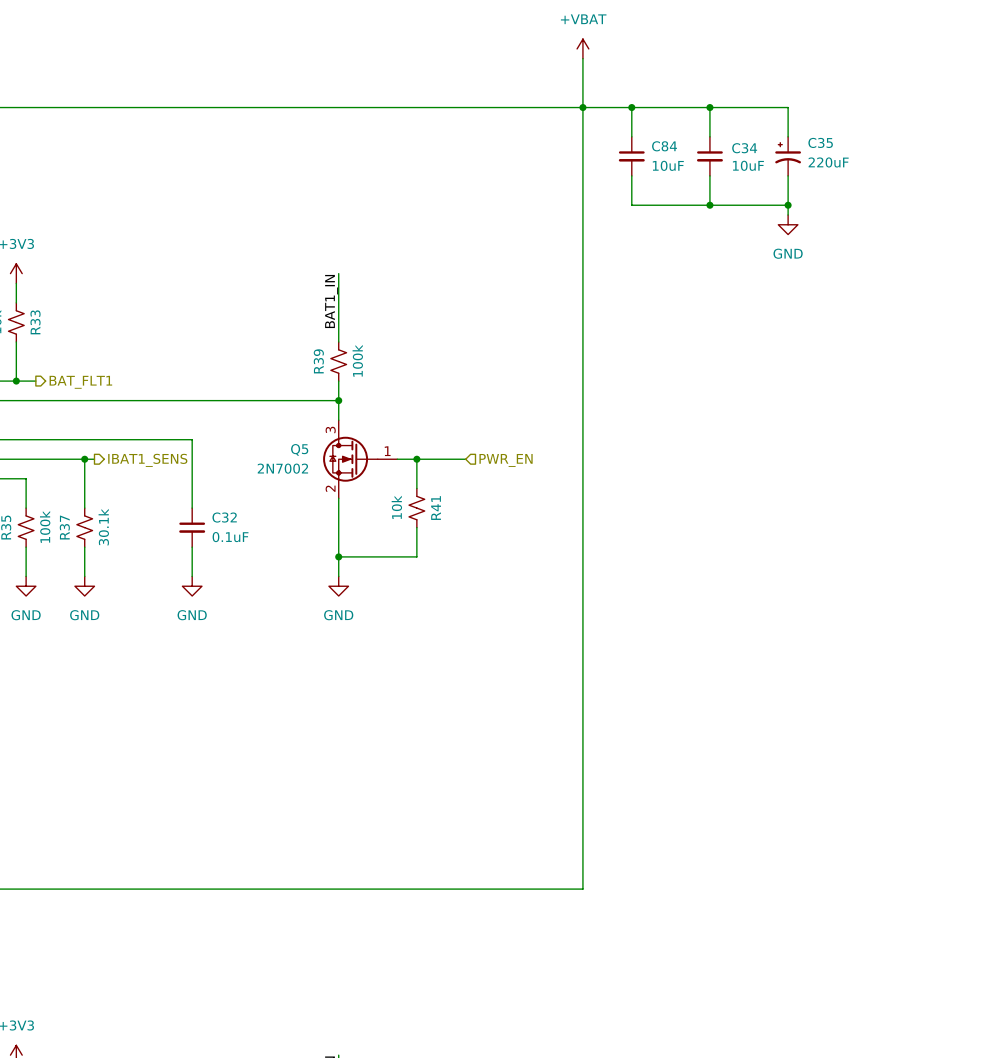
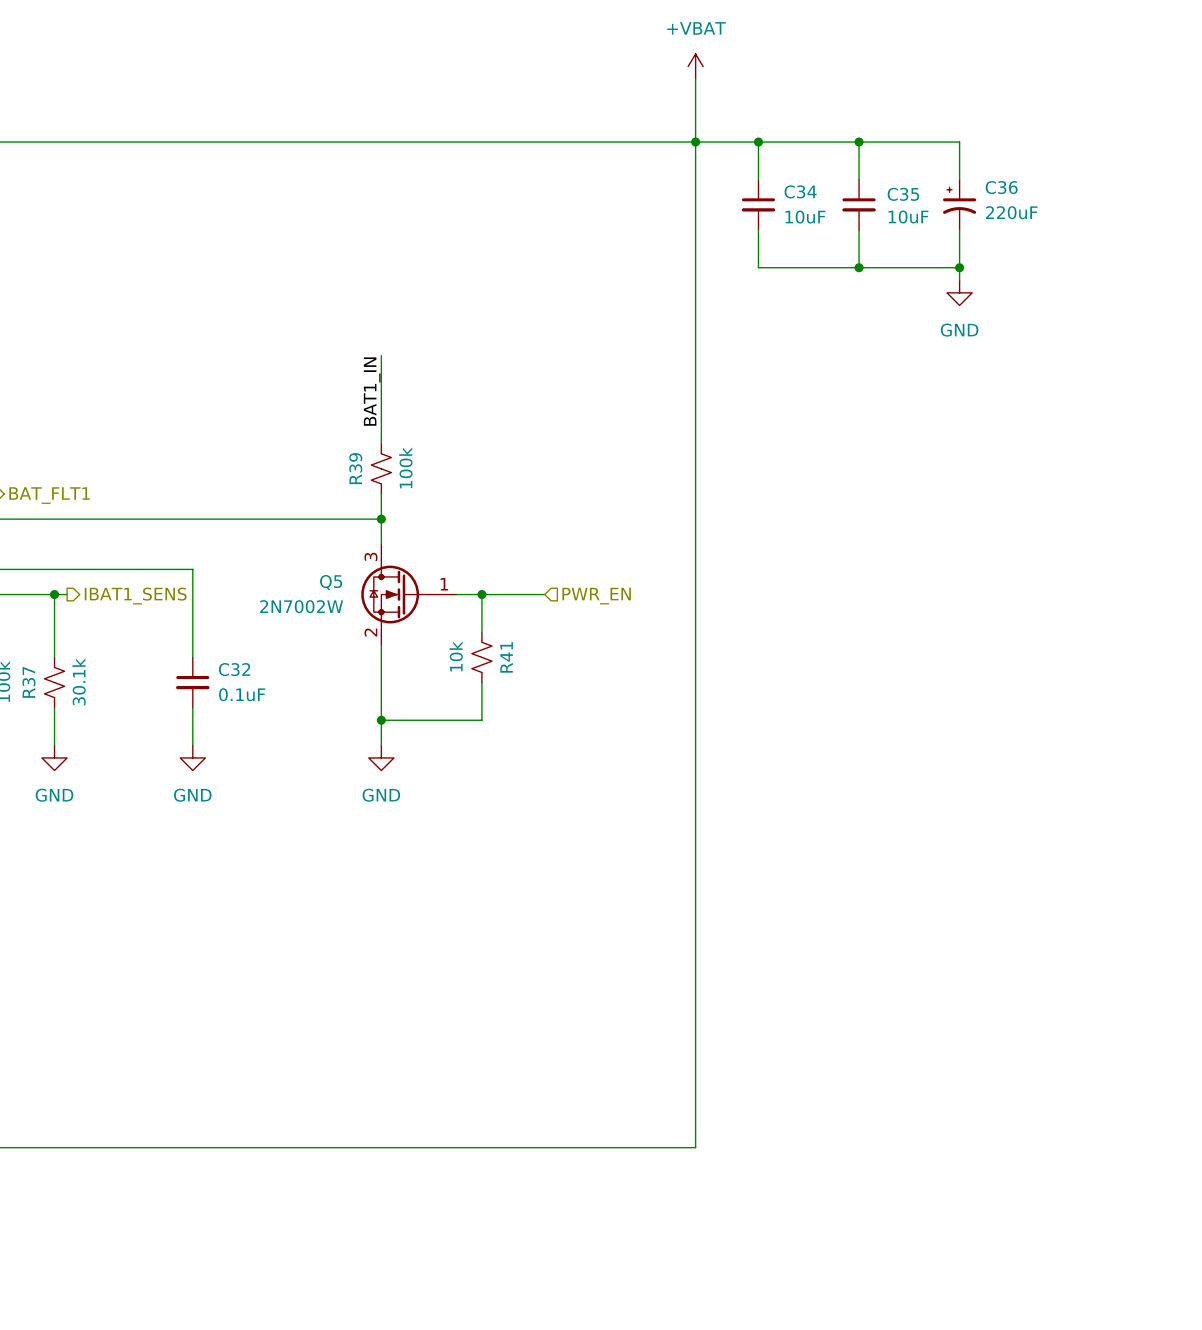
C35 name: C35 (820, 142) -> C36 (1001, 187)
C84 name: C84 (664, 146) -> C34 (800, 191)
C34 name: C34 (744, 148) -> C35 (903, 194)
Q5 value: 2N7002 (282, 468) -> 2N7002W (301, 606)

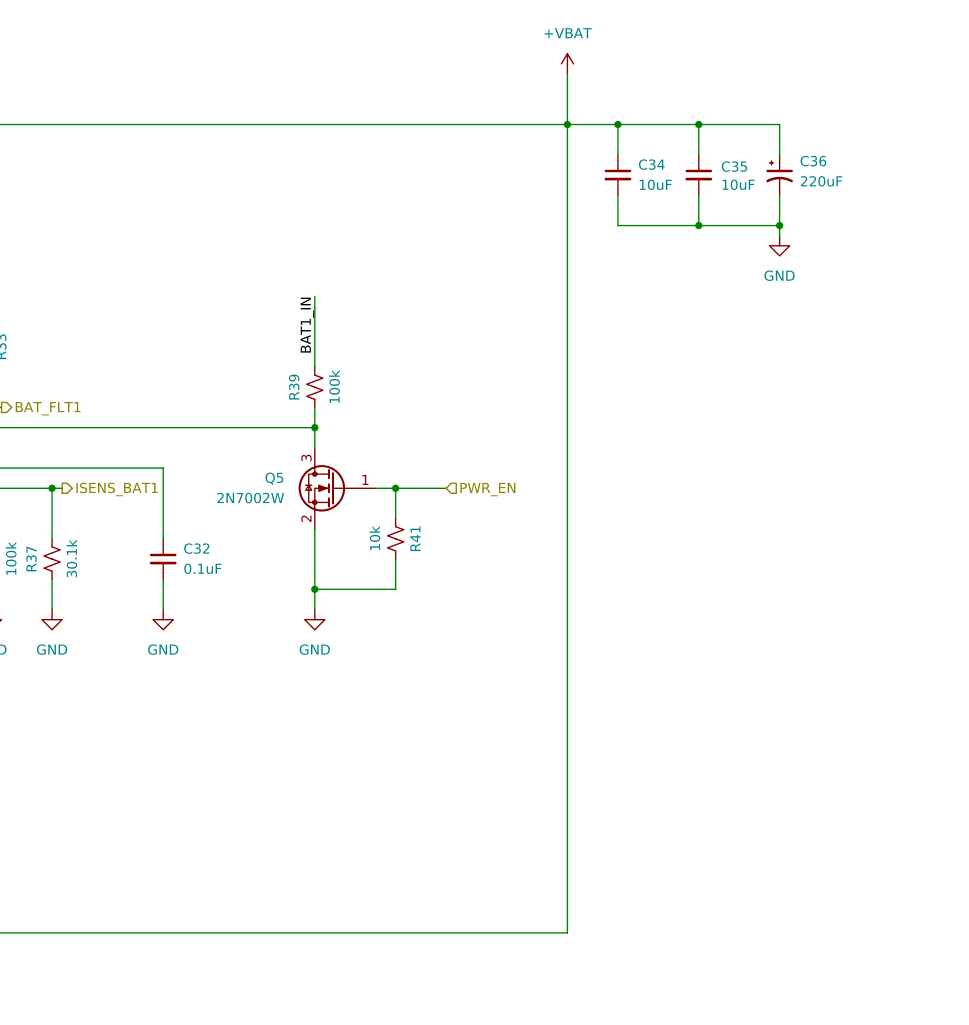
hierarchical label: IBAT1_SENS (135, 596) -> ISENS_BAT1 (117, 489)

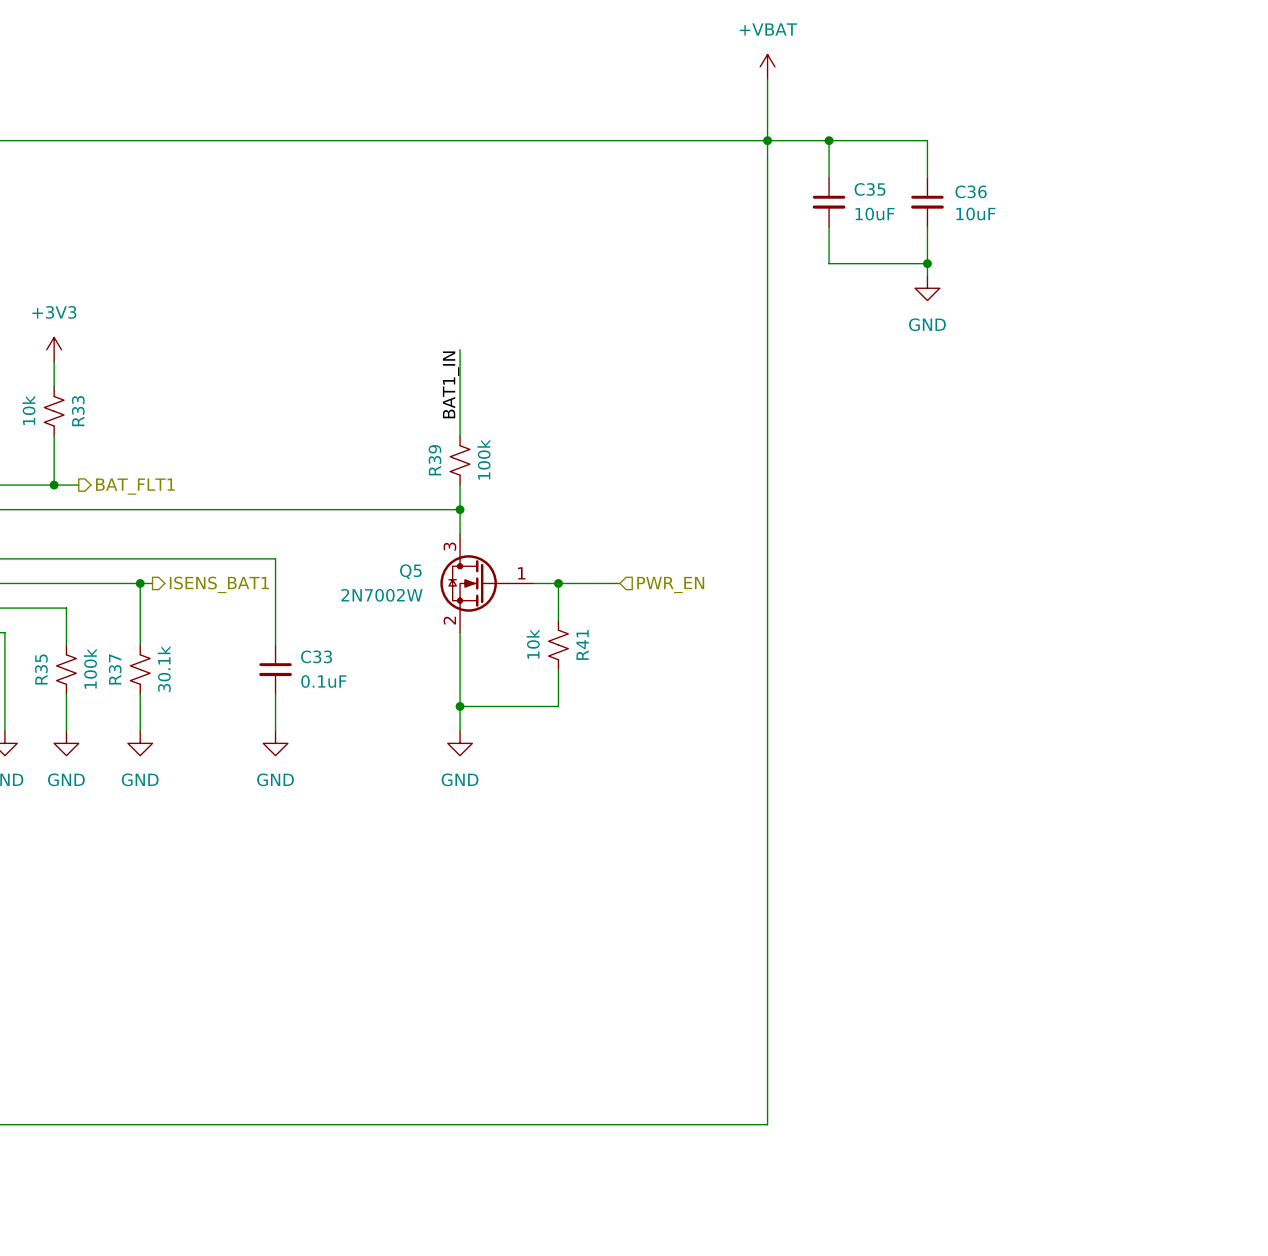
wire: (698, 124) (779, 124) (779, 154) -> none
junction: (698, 124) -> none
C34 name: C34 (651, 164) -> C35 (870, 189)
C35 name: C35 (734, 166) -> C36 (971, 191)
C36: 220uF (779, 175) -> none
wire: (779, 195) (779, 235) -> none
wire: (698, 225) (779, 225) -> (927, 263) (927, 275)
junction: (779, 225) -> none
power symbol position: GND (779, 245) -> GND (927, 288)
C32 name: C32 (196, 548) -> C33 (316, 656)

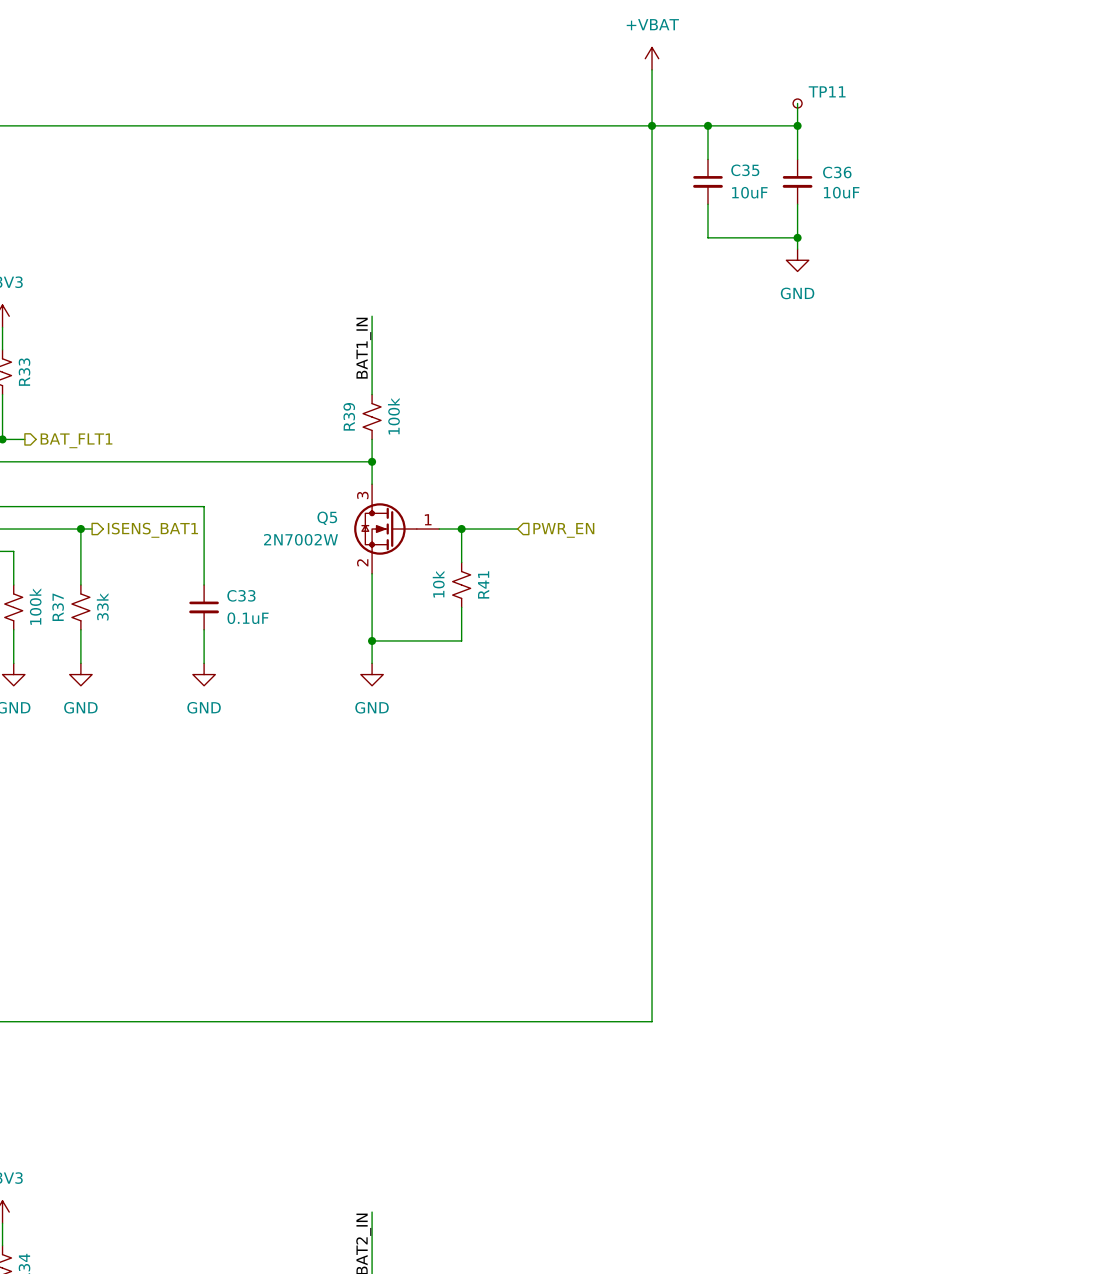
wire: none -> (797, 103) (797, 125)
TP11: none -> (797, 103)
junction: none -> (797, 125)
R37 value: 30.1k (164, 668) -> 33k (102, 606)

